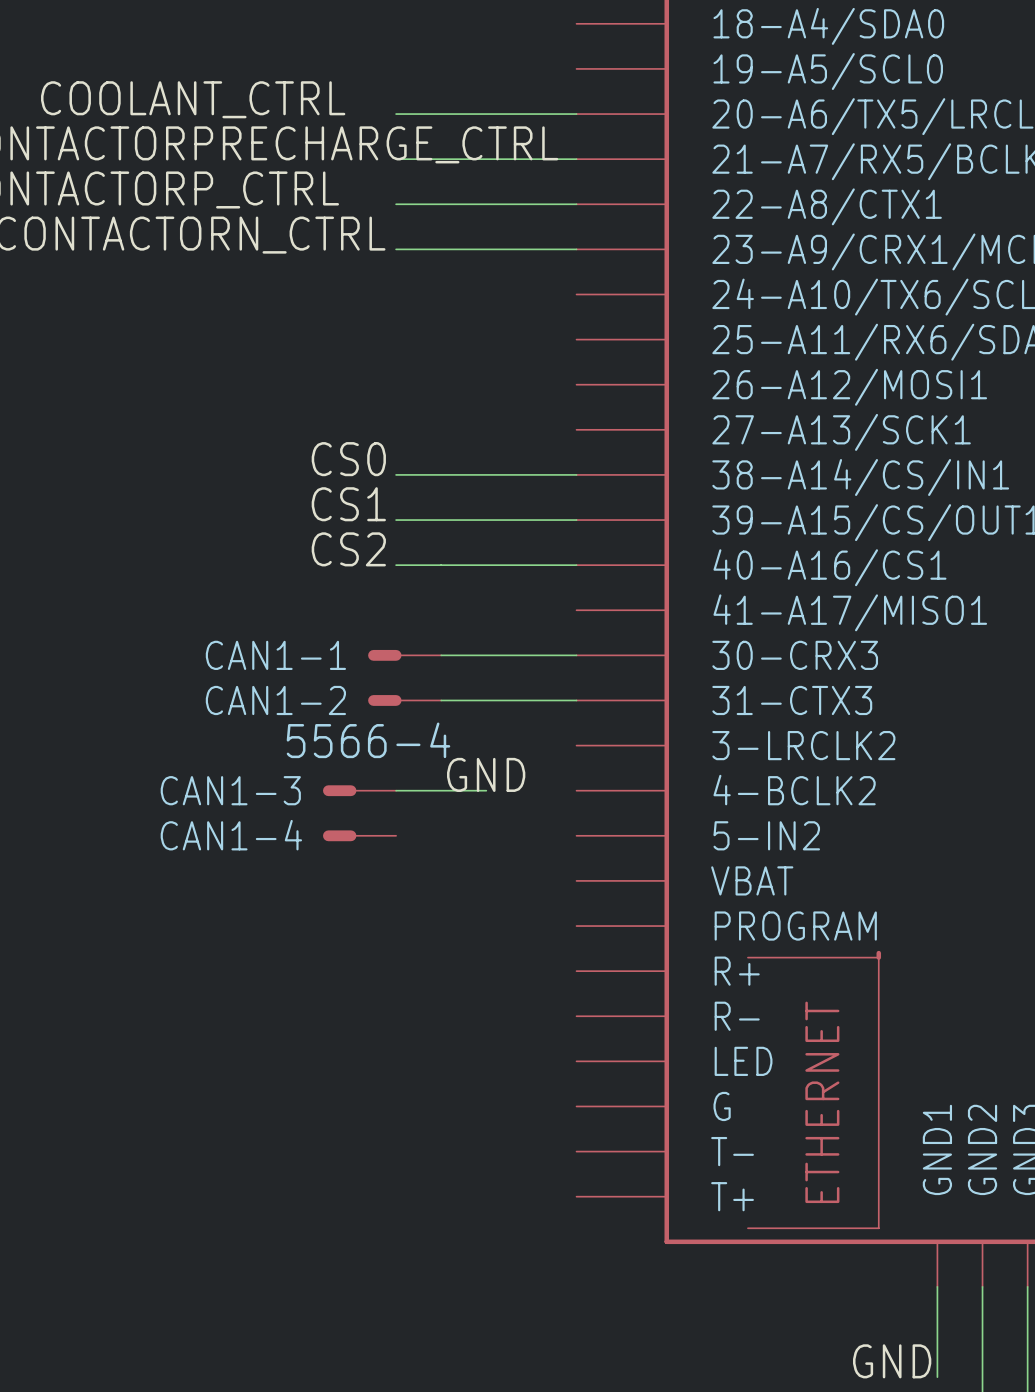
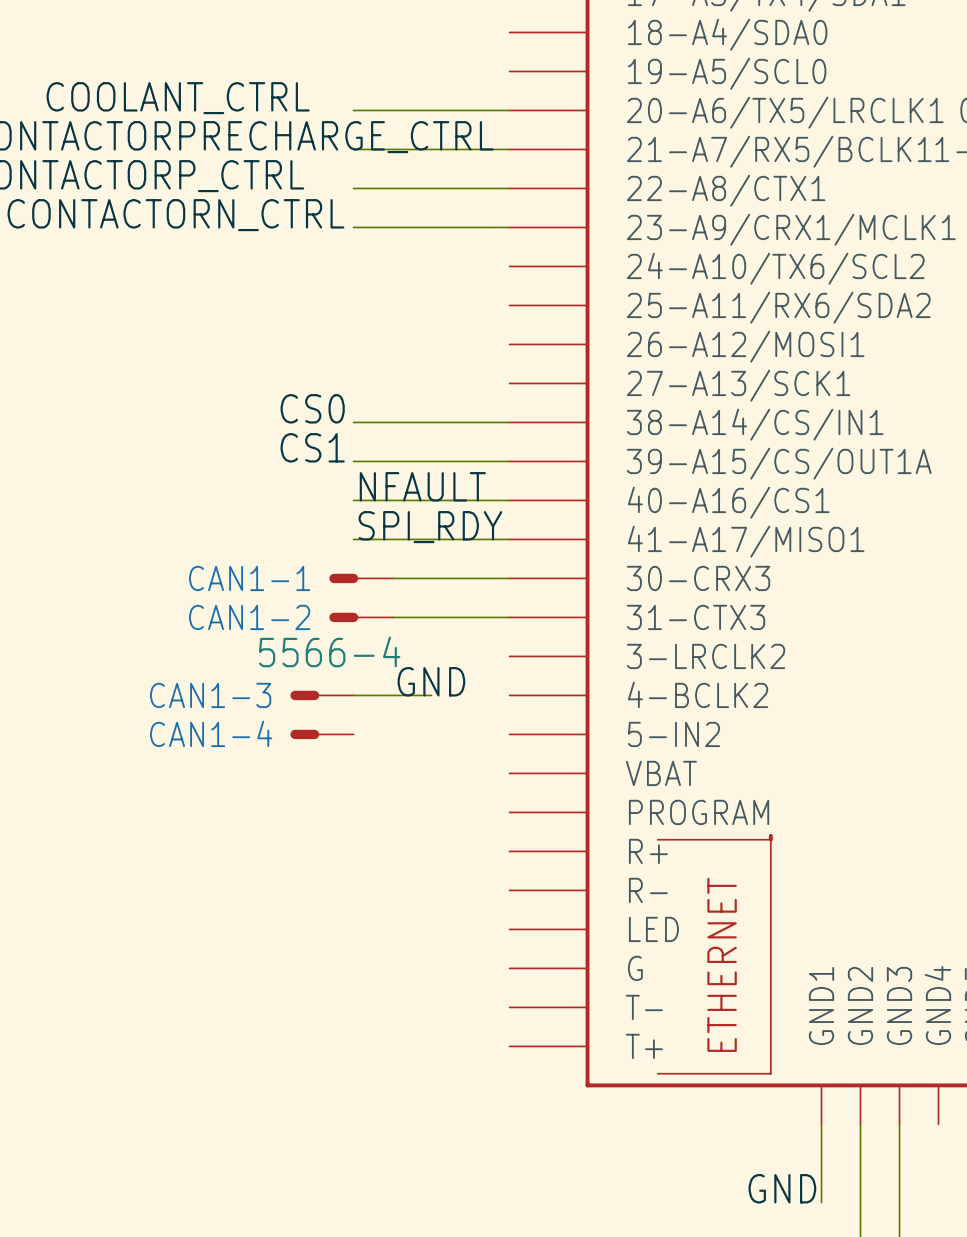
label: CS2 (348, 549) -> none
label: none -> NFAULT (422, 486)
label: none -> SPI_RDY (430, 527)
wire: none -> (353, 539) (509, 539)

